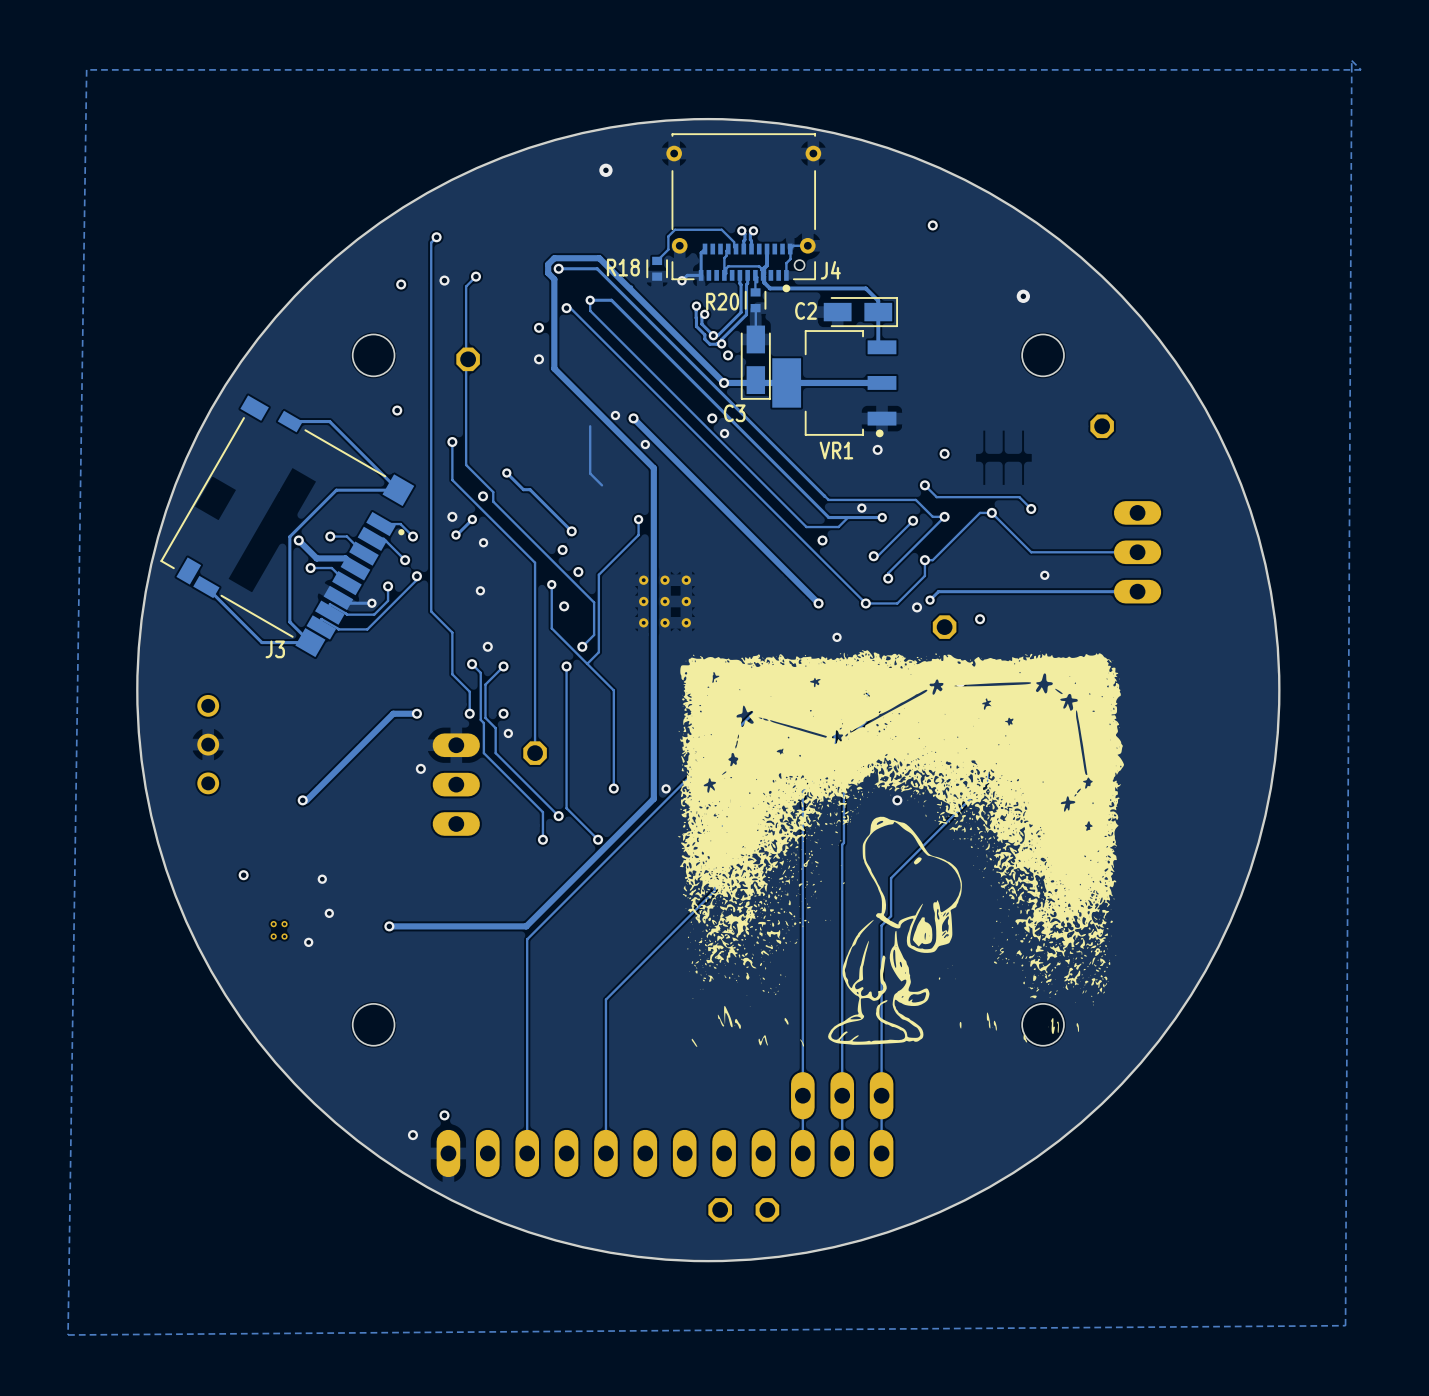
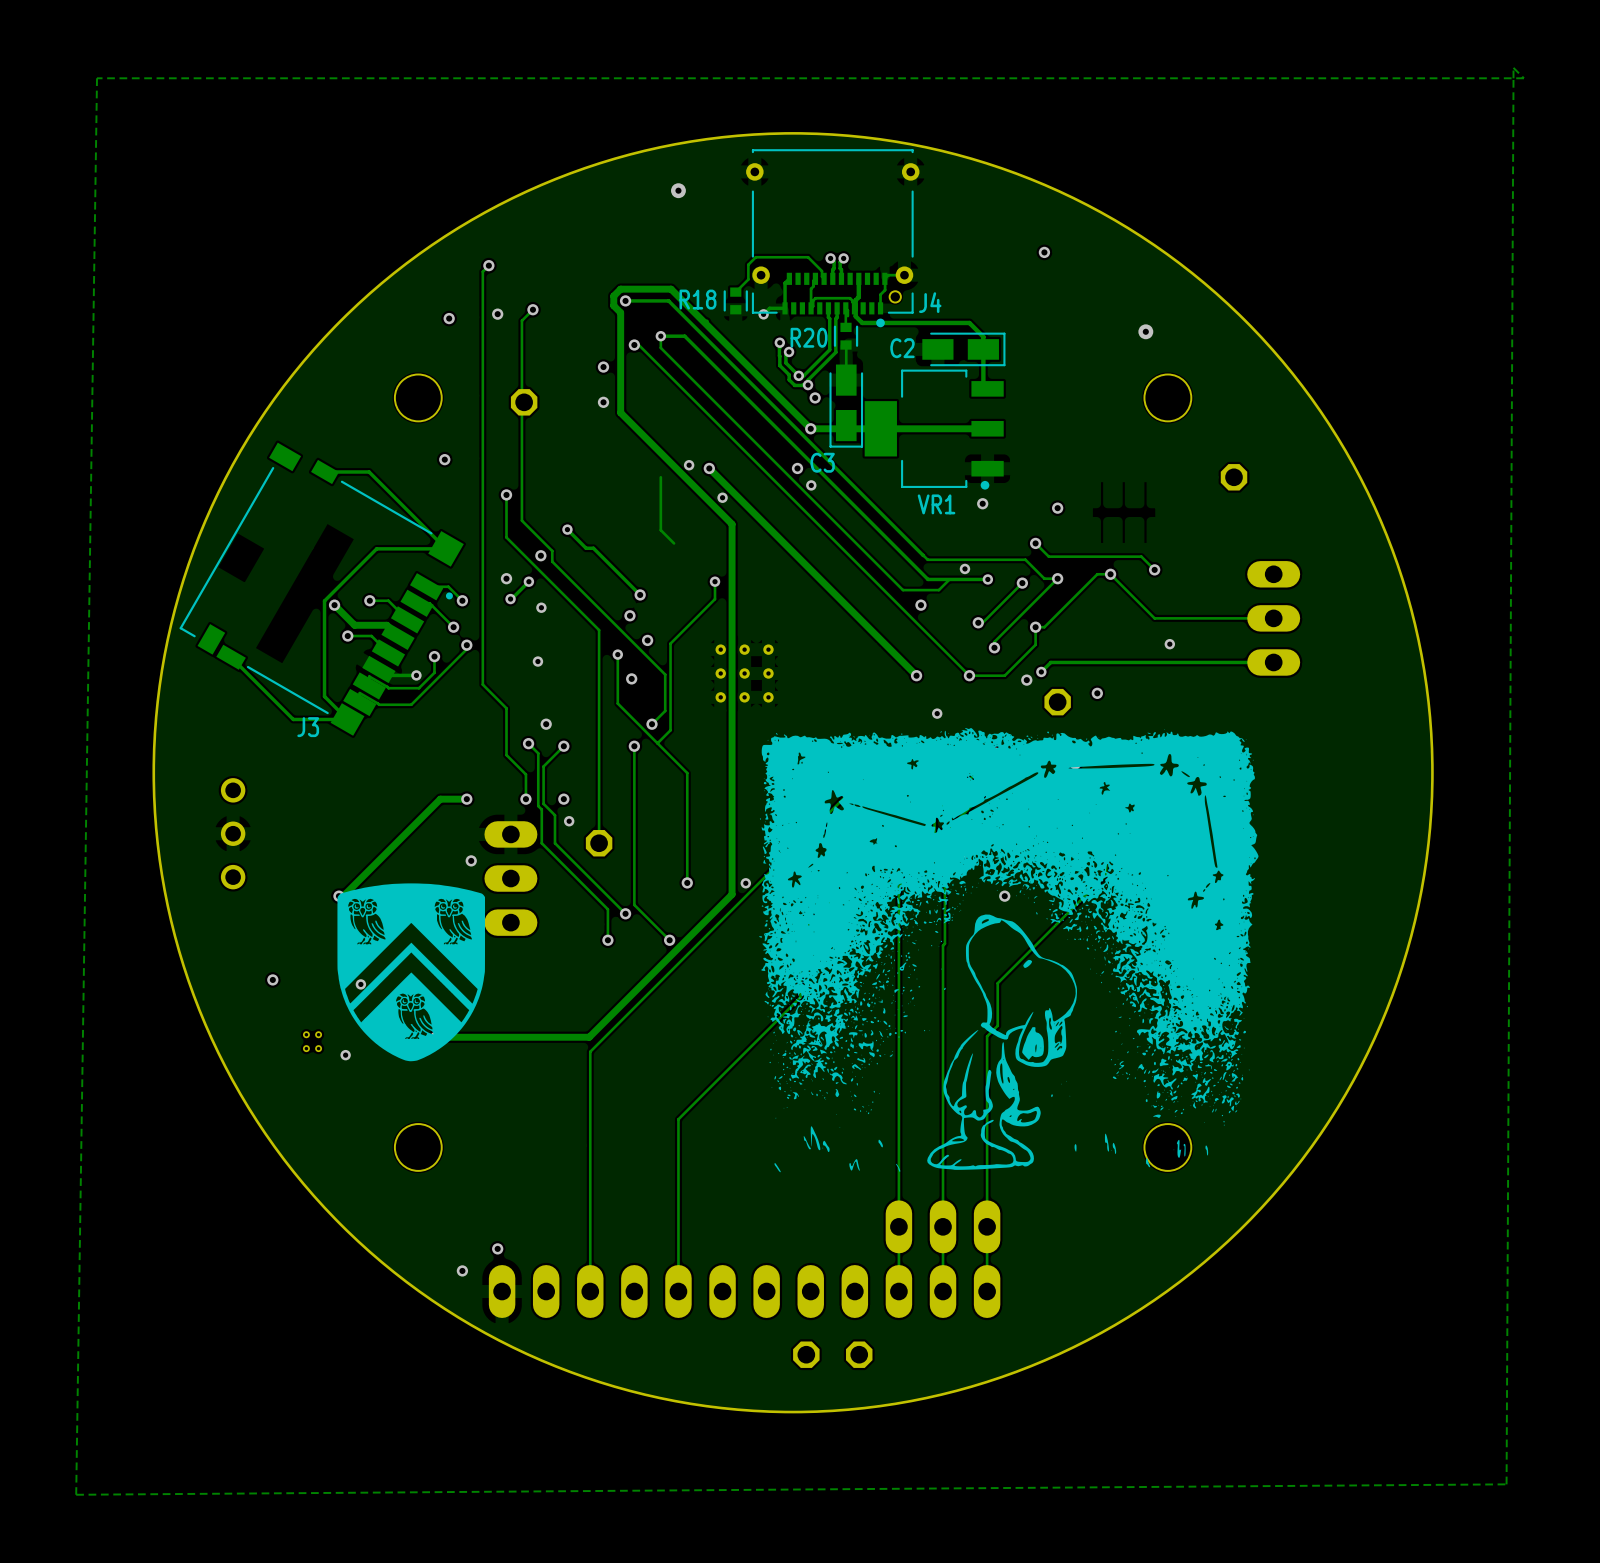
drawing: none -> [337, 883, 486, 1062]

